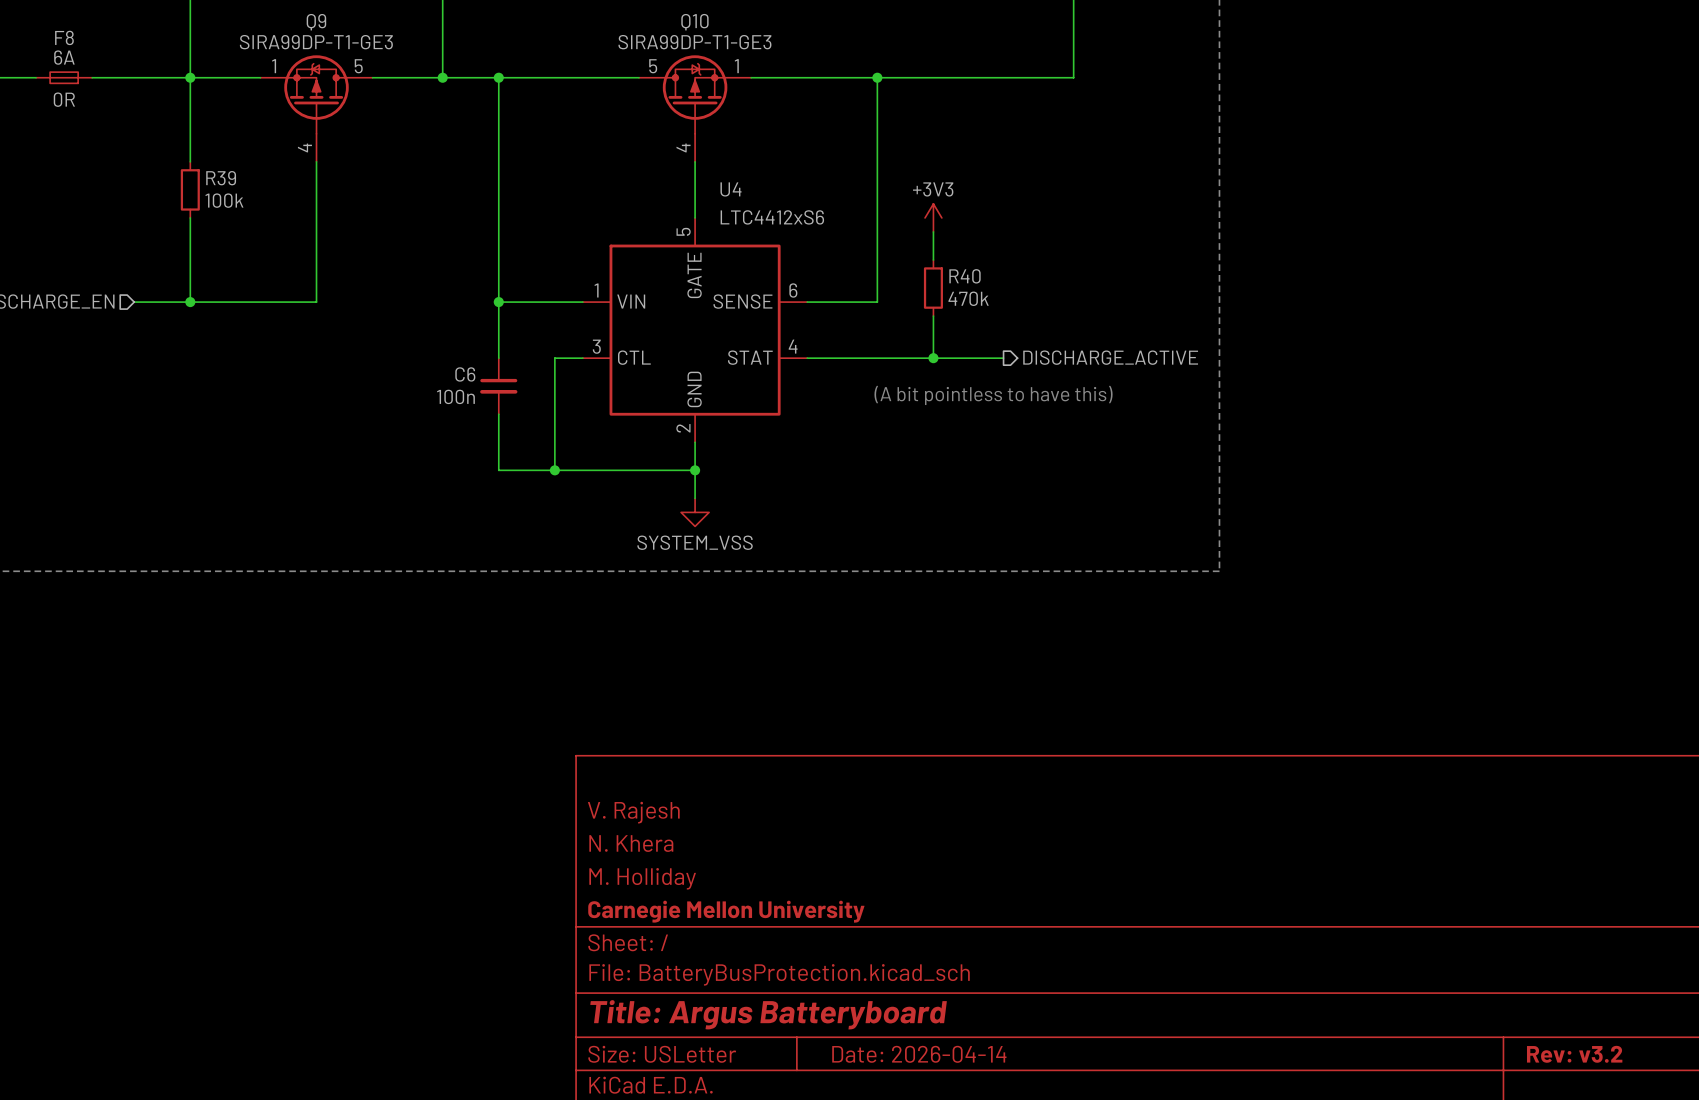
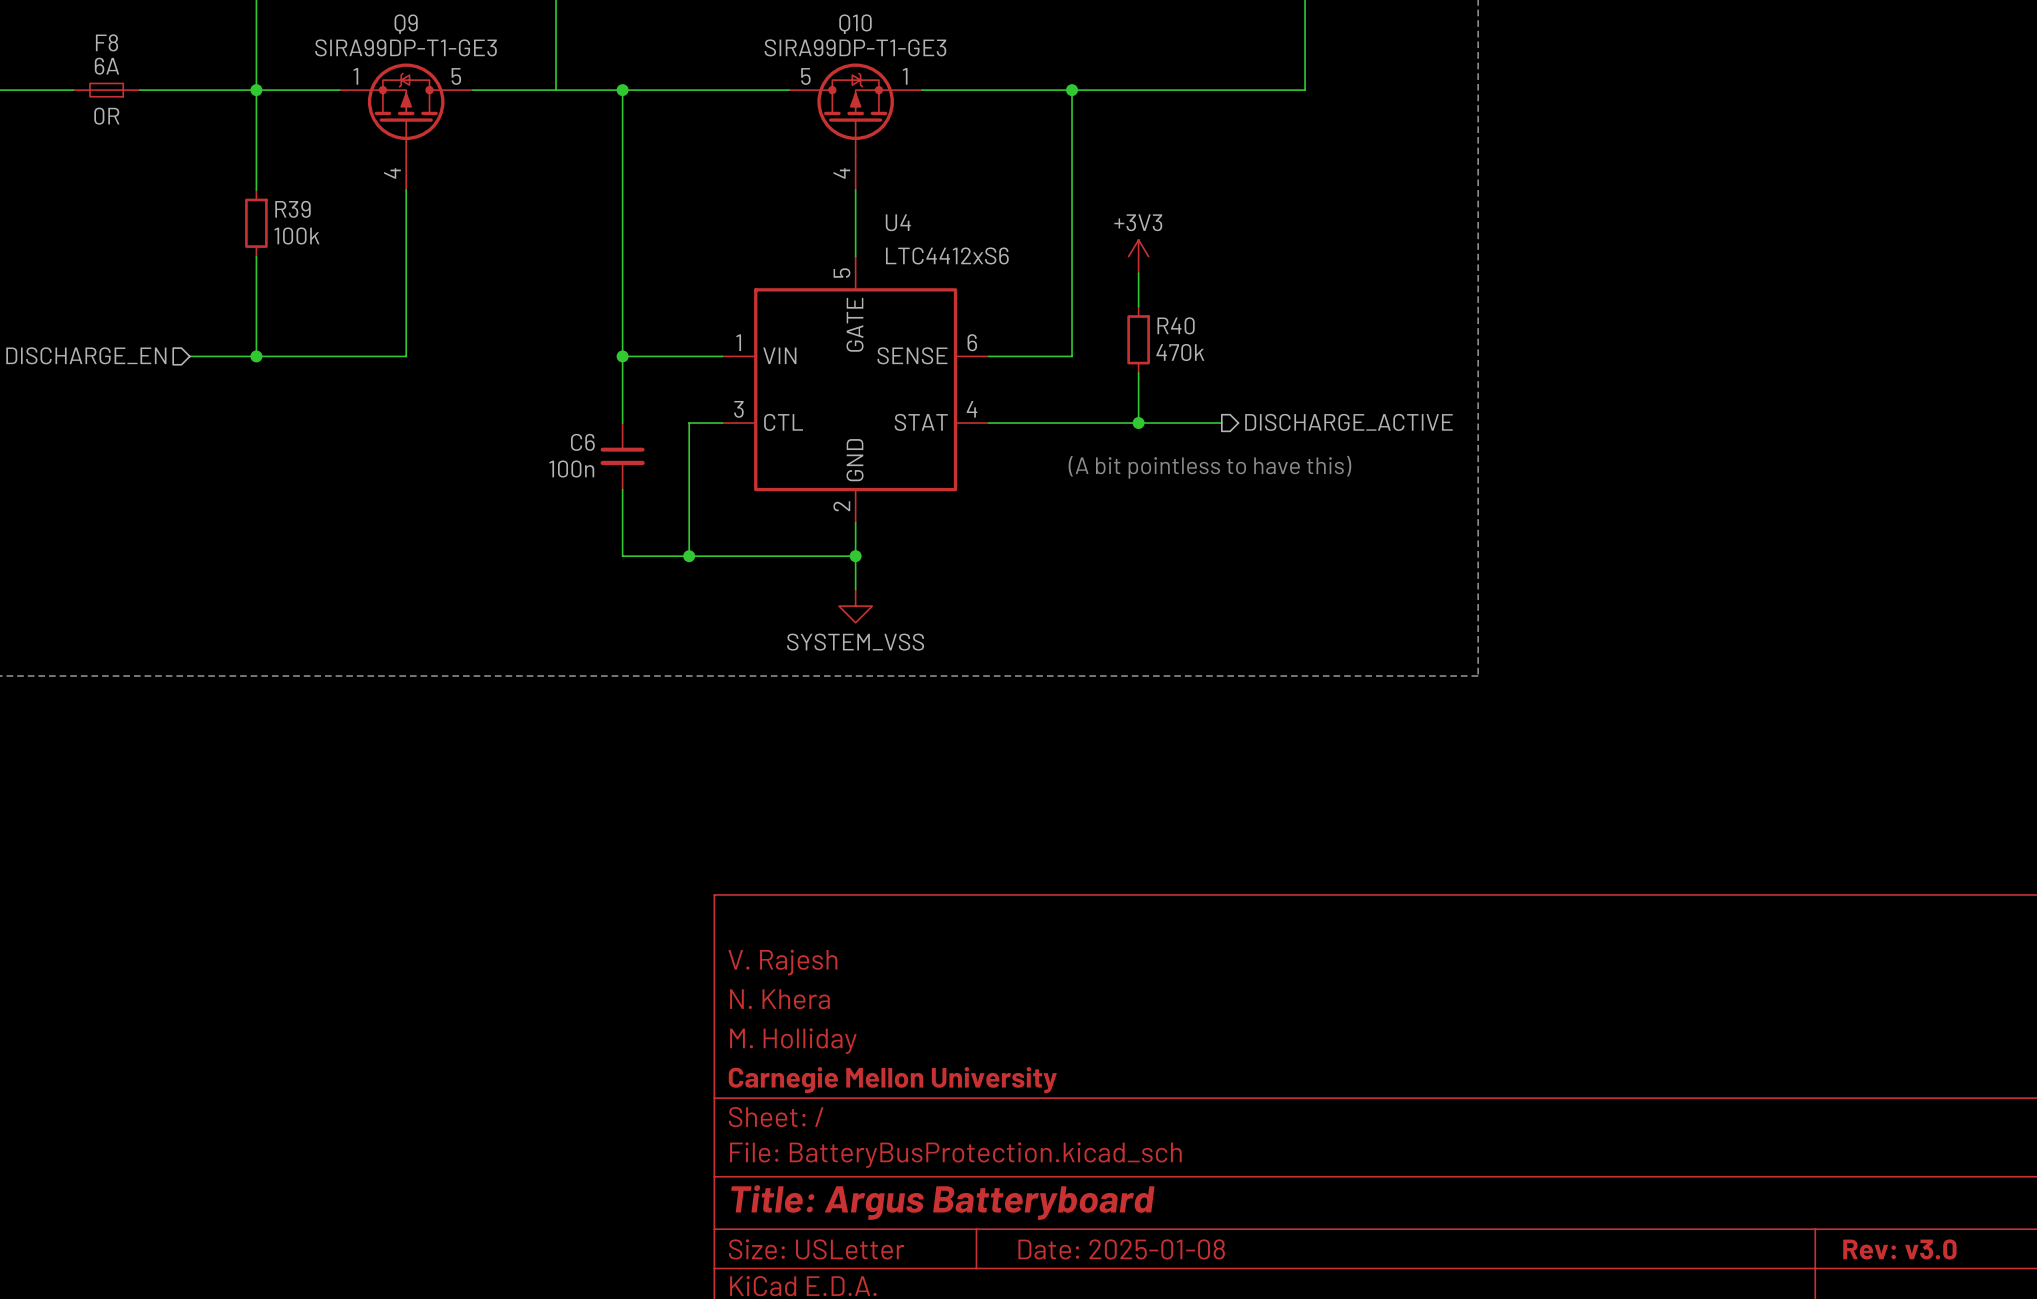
junction: (442, 77) -> none
title block: Date: 2026-04-14 (919, 1054) -> Date: 2025-01-08 (1121, 1249)
title block: Rev: v3.2 (1574, 1054) -> Rev: v3.0 (1899, 1249)

